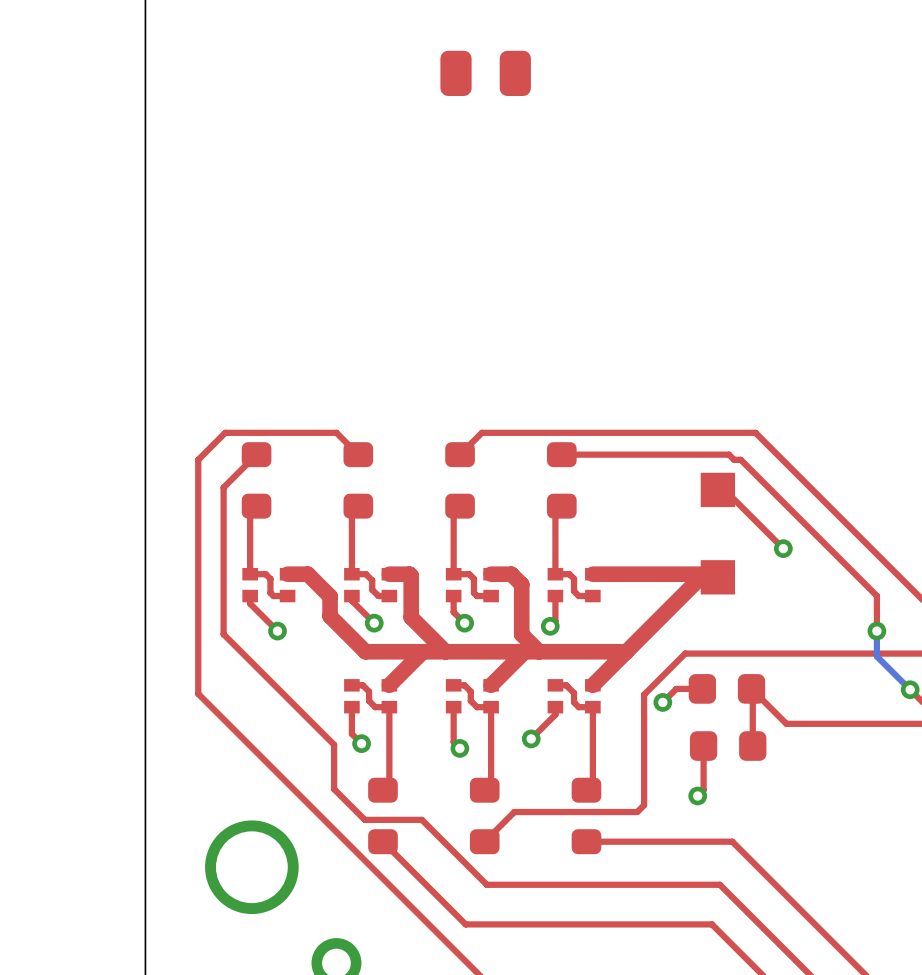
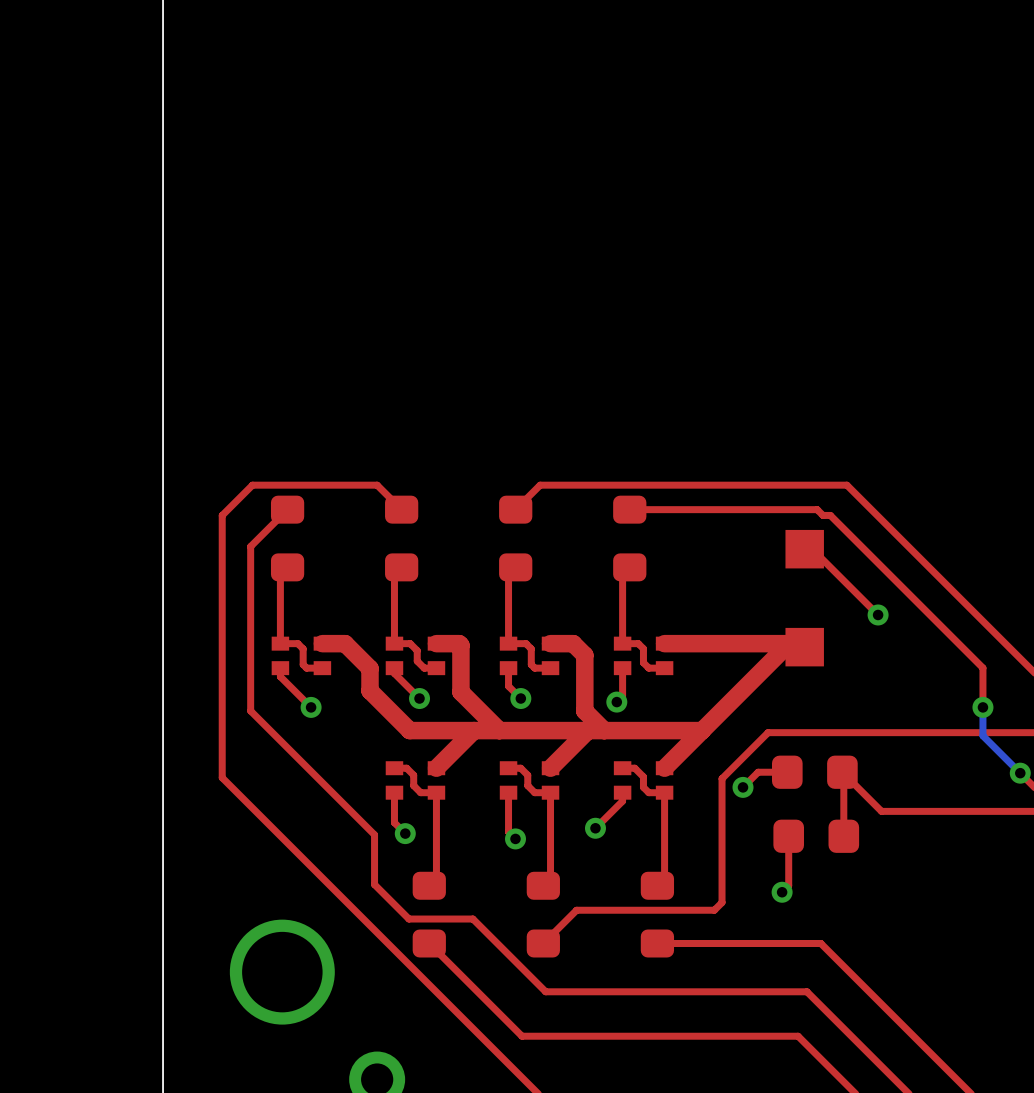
part: (485, 73) -> none

